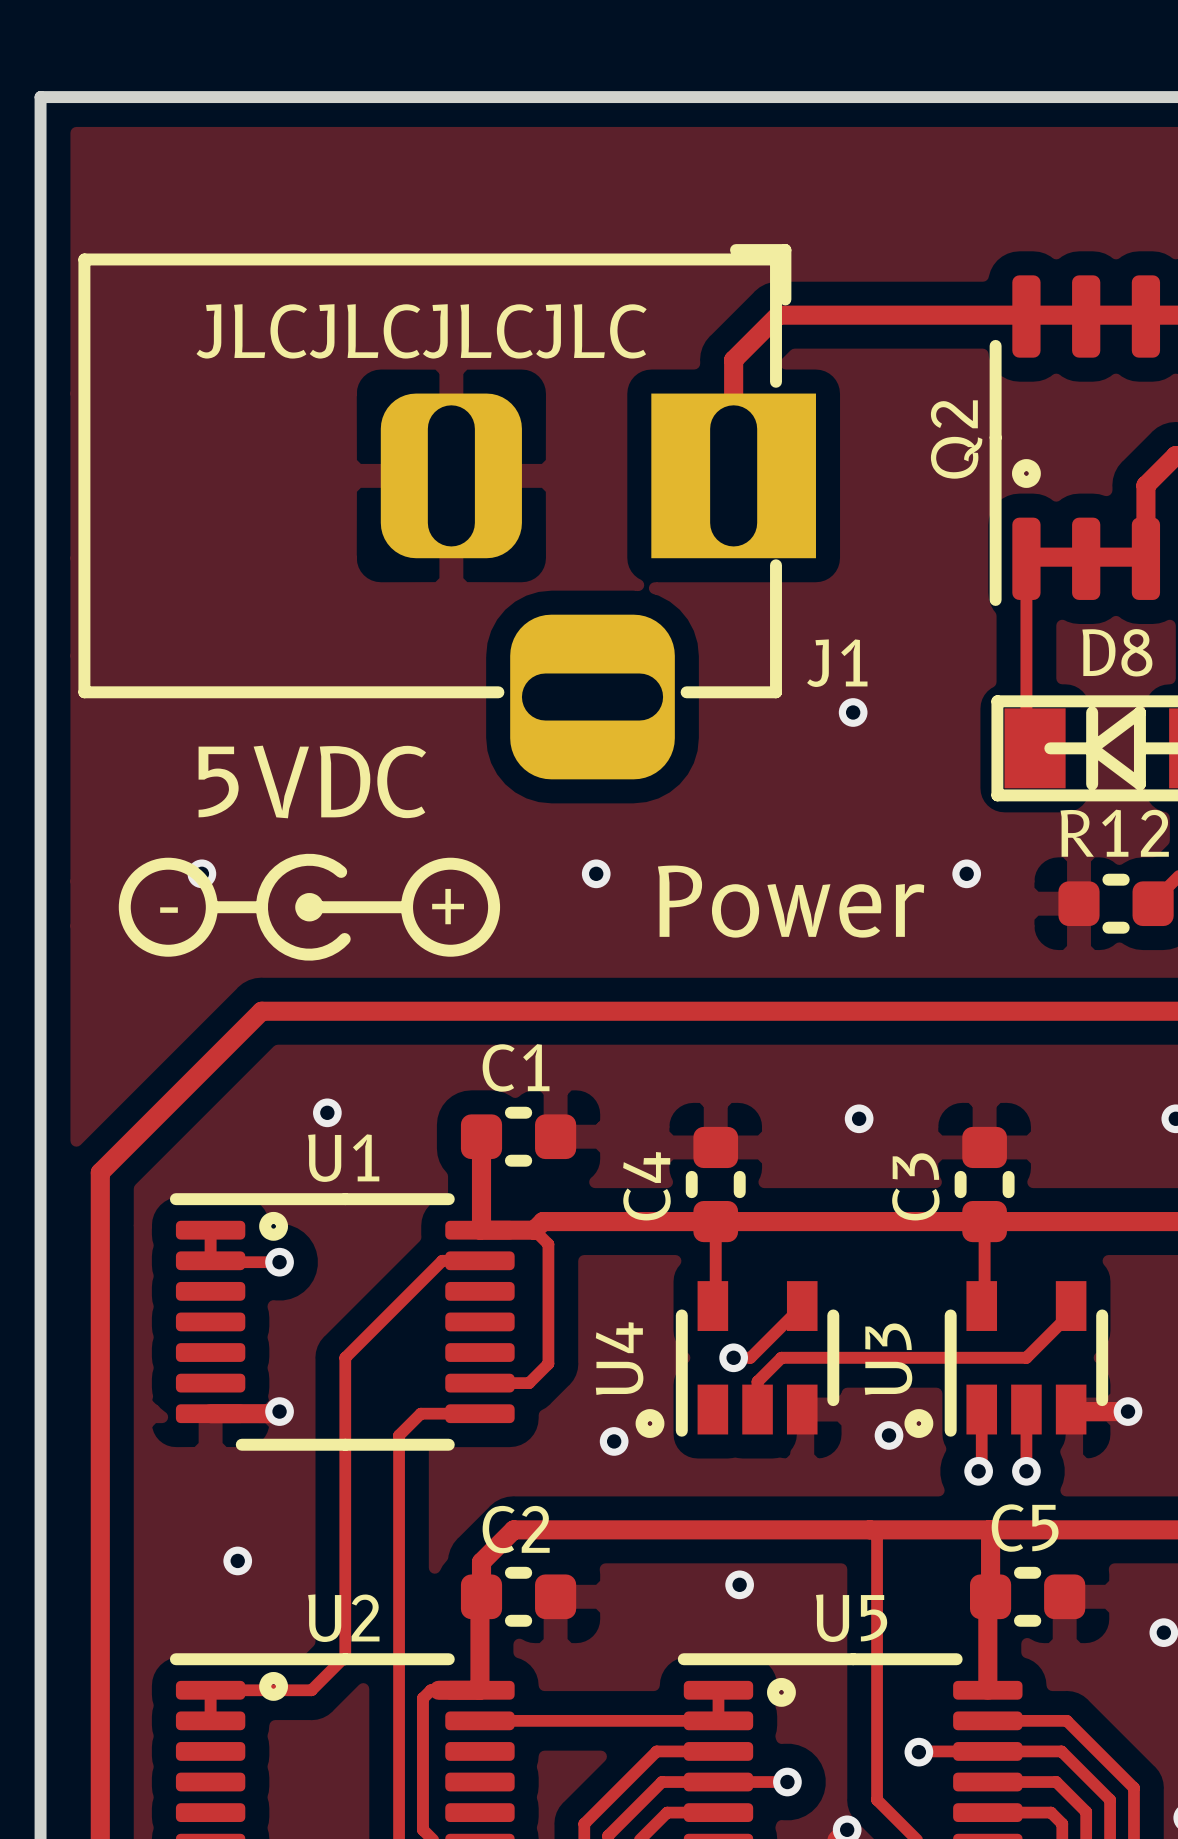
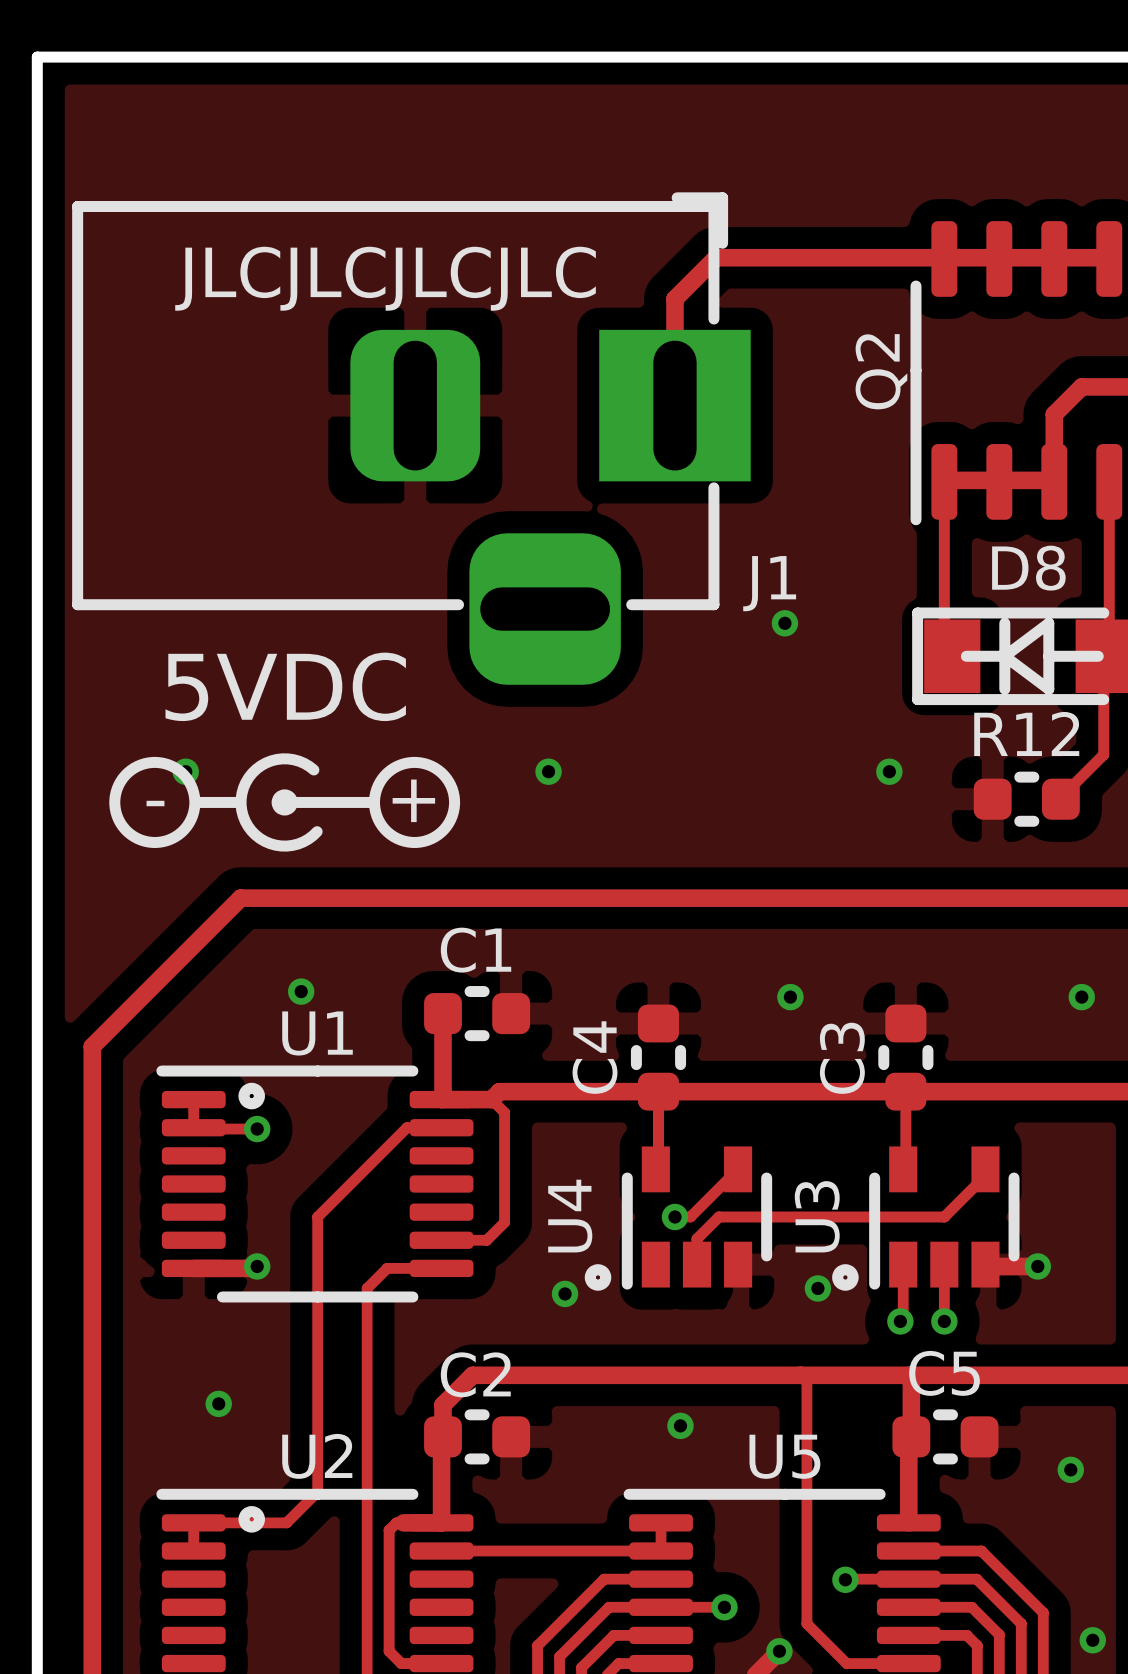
drawing: [1012, 459, 1041, 488] -> none
text: Power (791, 901) -> none
drawing: [767, 1677, 796, 1707] -> none

